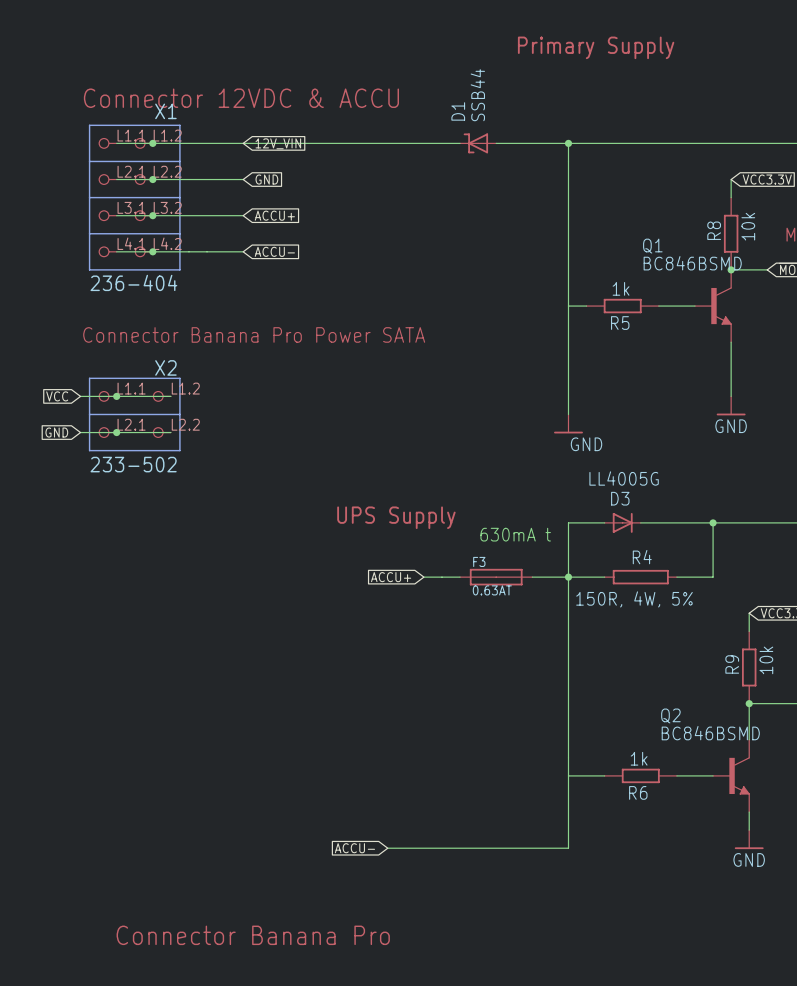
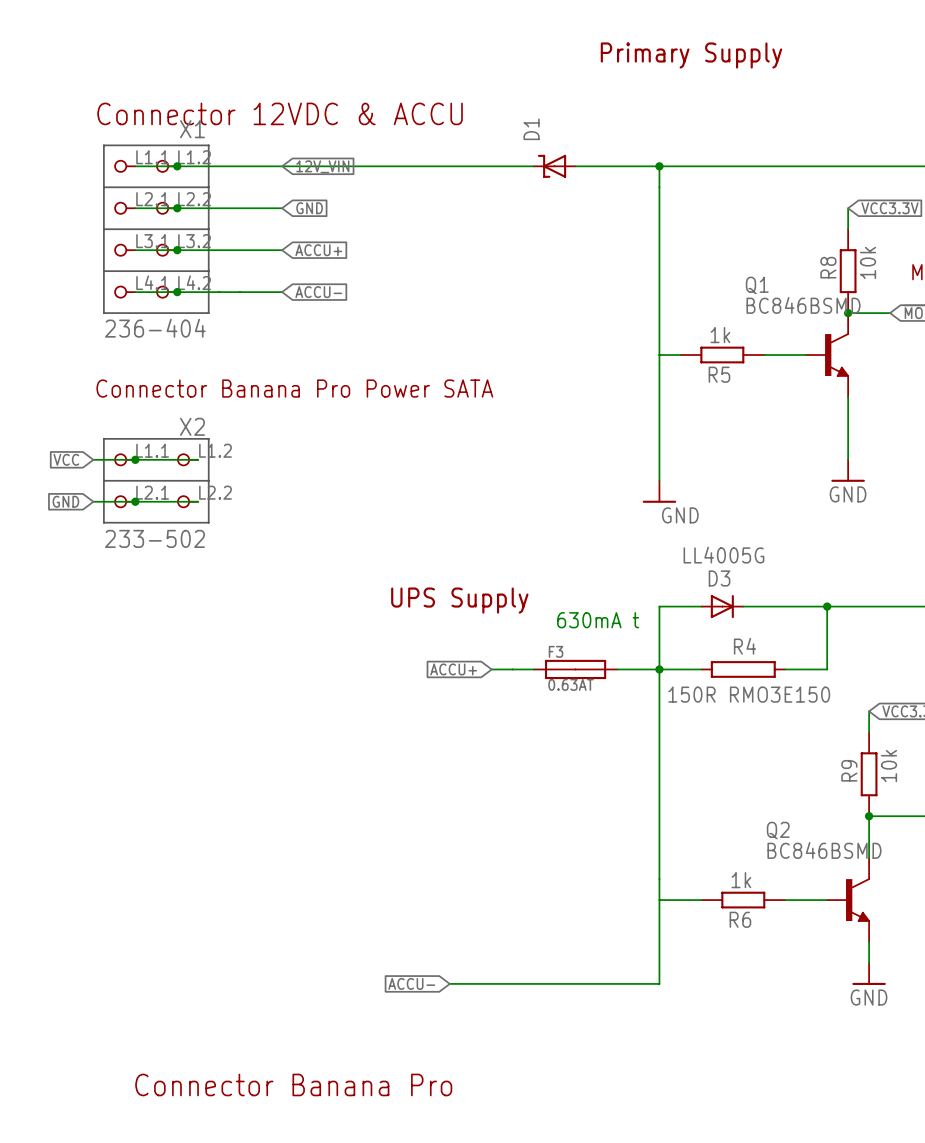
D1 value: SSB44 (477, 95) -> none
R4 value: 150R, 4W, 5% (634, 599) -> 150R RMO3E150 (749, 694)

